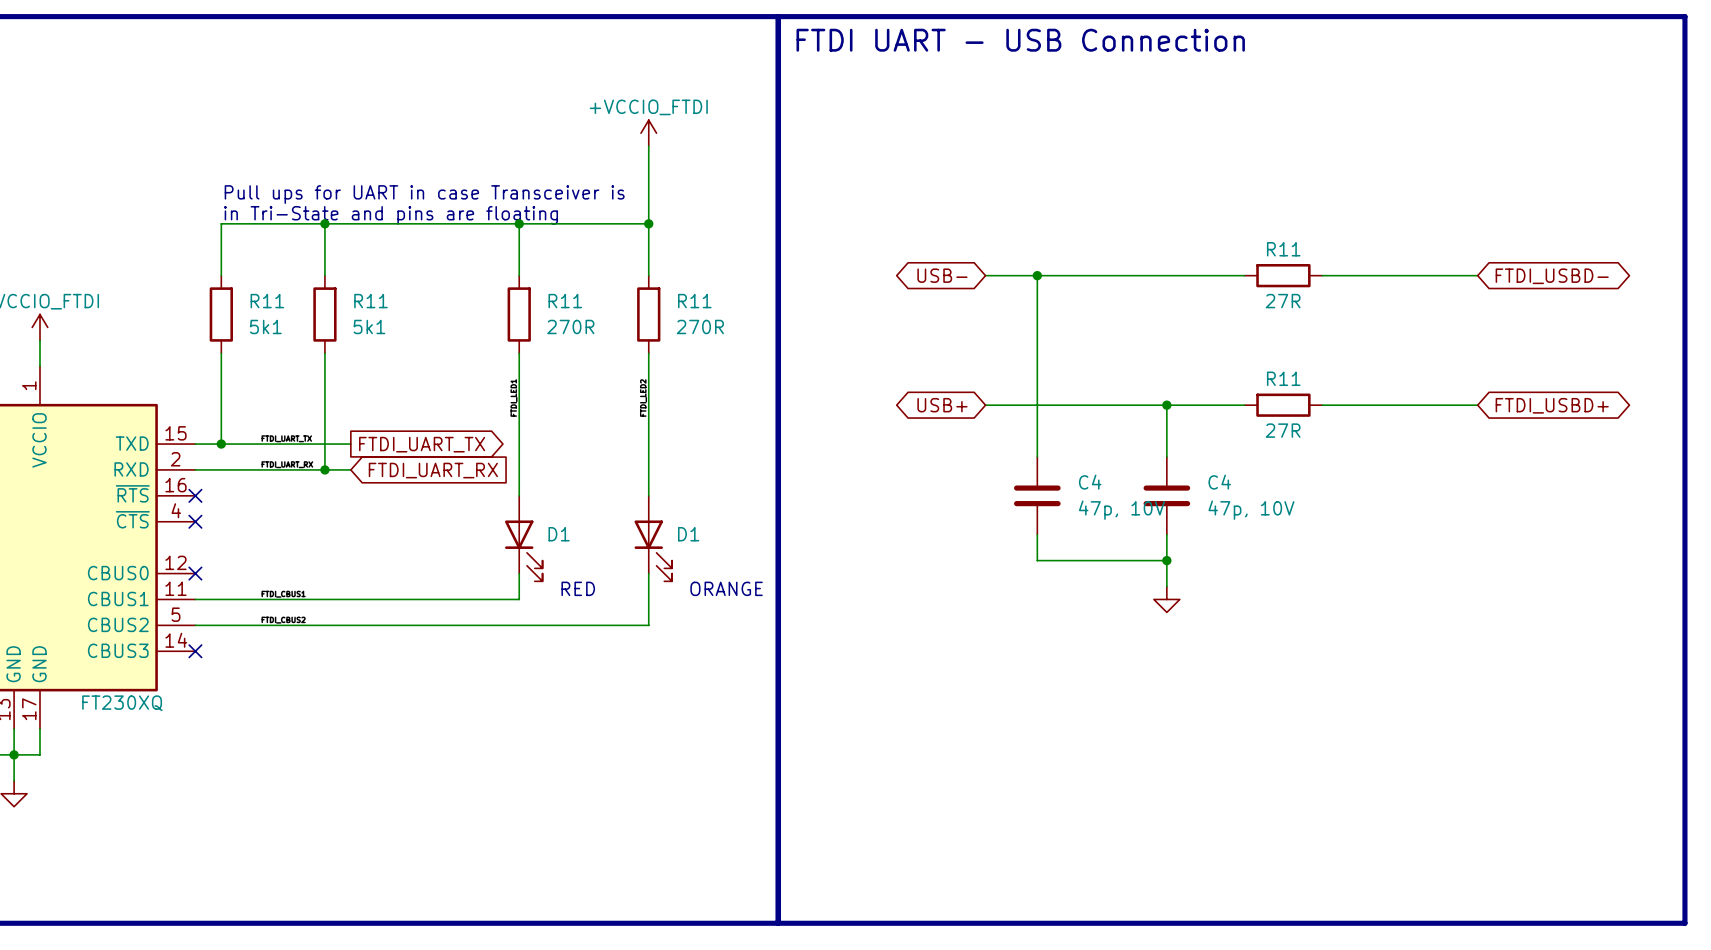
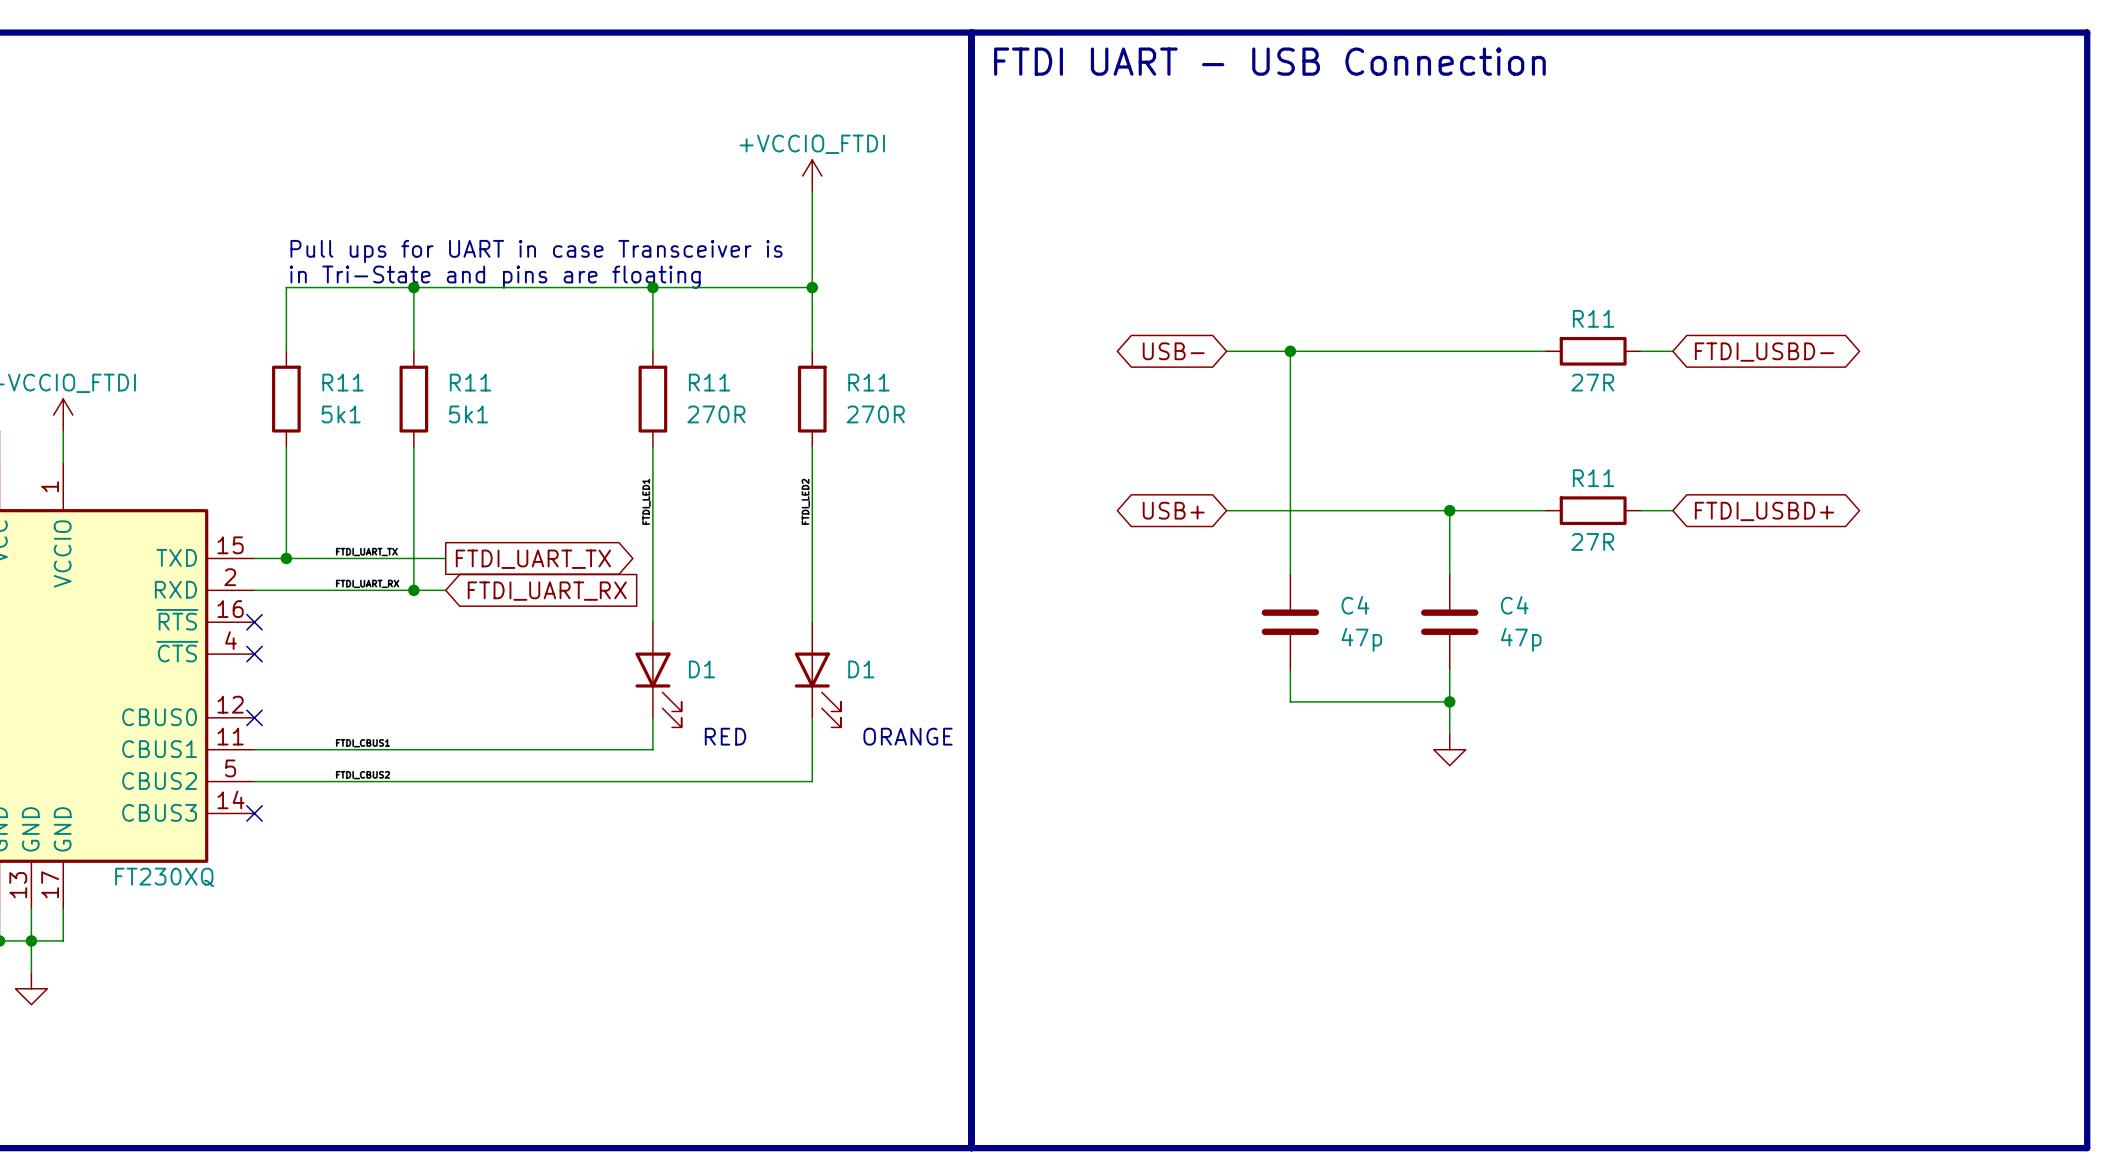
wire: (1348, 275) (1477, 275) -> none
global label position: FTDI_USBD- (1552, 276) -> FTDI_USBD- (1764, 352)
wire: (1348, 405) (1477, 405) -> none
global label position: FTDI_USBD+ (1552, 405) -> FTDI_USBD+ (1764, 511)
C4 value: 47p, 10V (1121, 510) -> 47p (1361, 639)
C4 value: 47p, 10V (1251, 510) -> 47p (1521, 639)

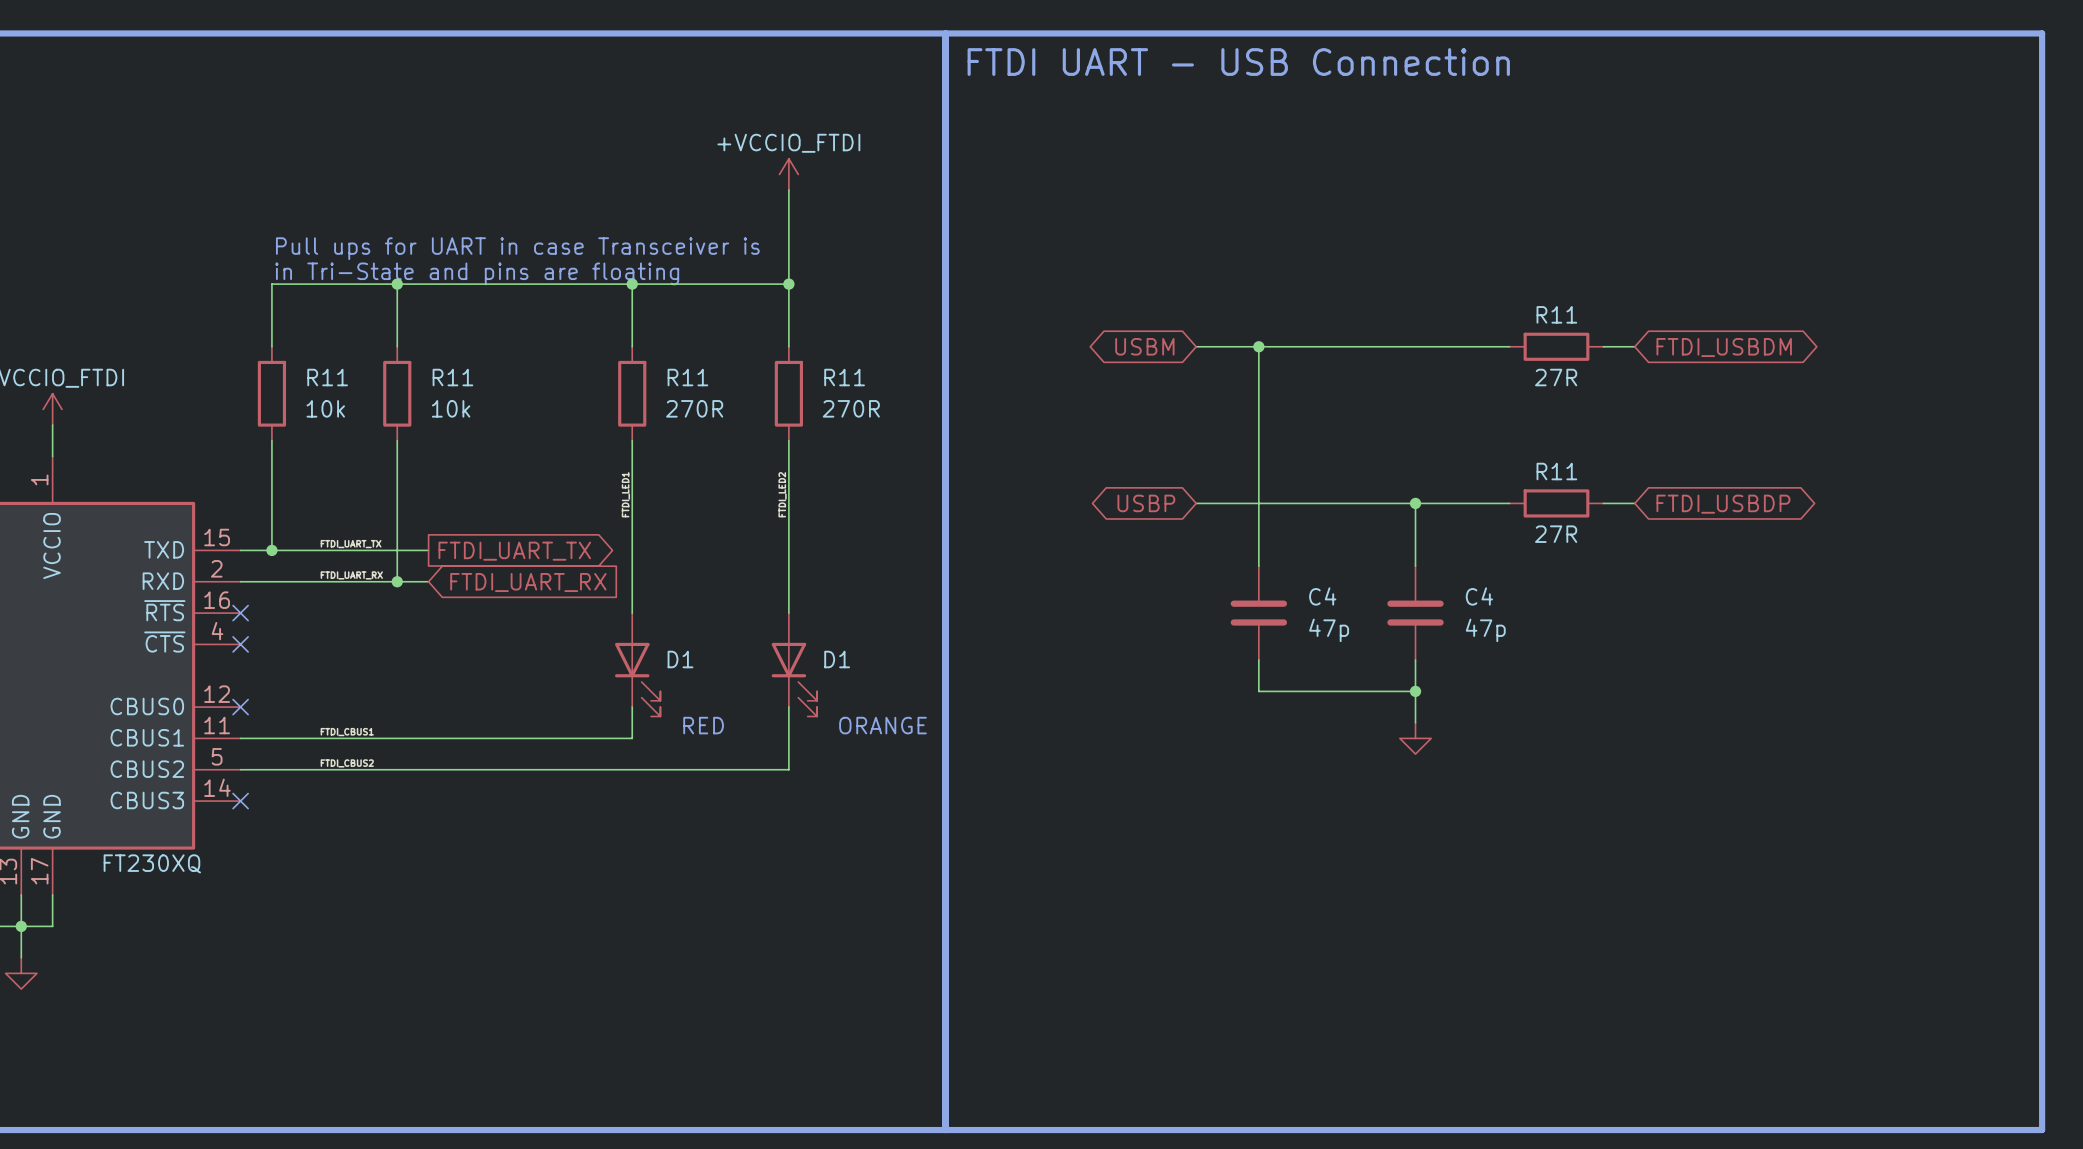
global label: USB- (1173, 351) -> USBM (1144, 346)
global label: FTDI_USBD- (1764, 352) -> FTDI_USBDM (1724, 347)
R11 value: 5k1 (341, 414) -> 10k (325, 408)
R11 value: 5k1 (468, 414) -> 10k (451, 408)
global label: USB+ (1173, 510) -> USBP (1146, 503)
global label: FTDI_USBD+ (1764, 511) -> FTDI_USBDP (1723, 504)

